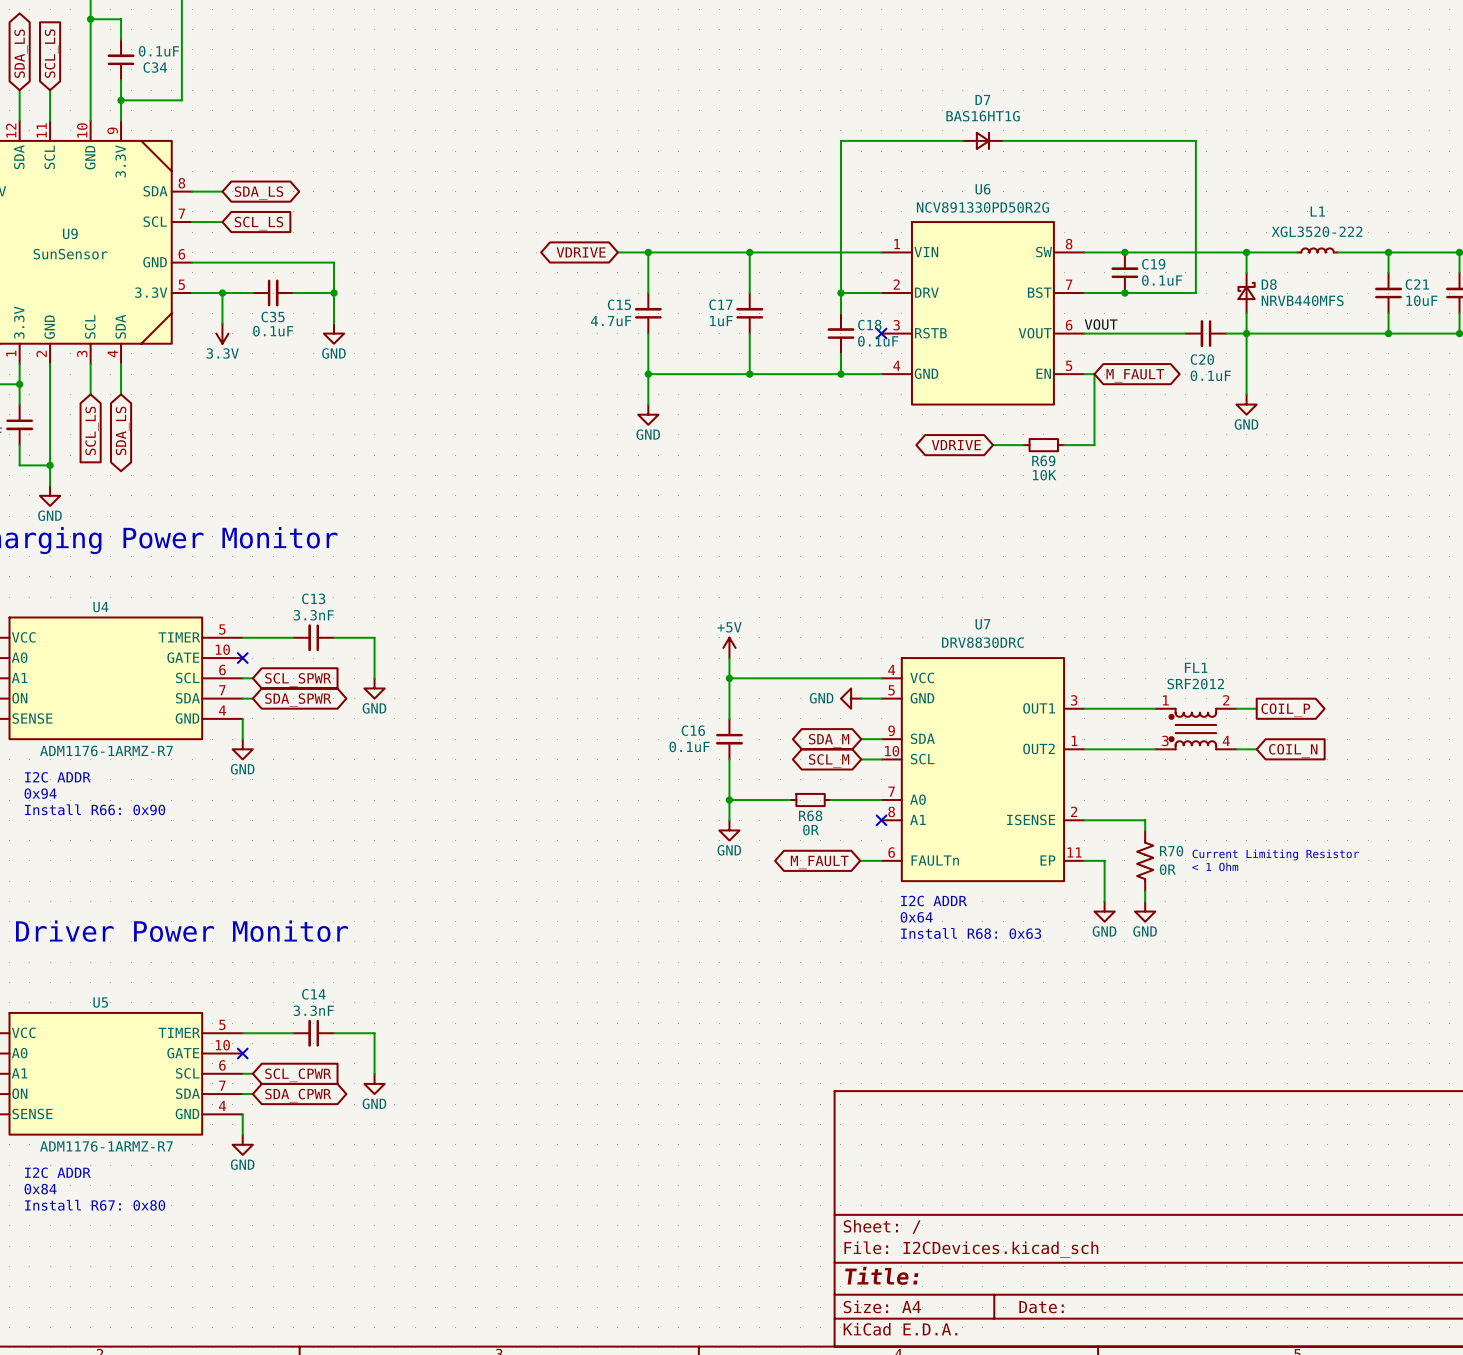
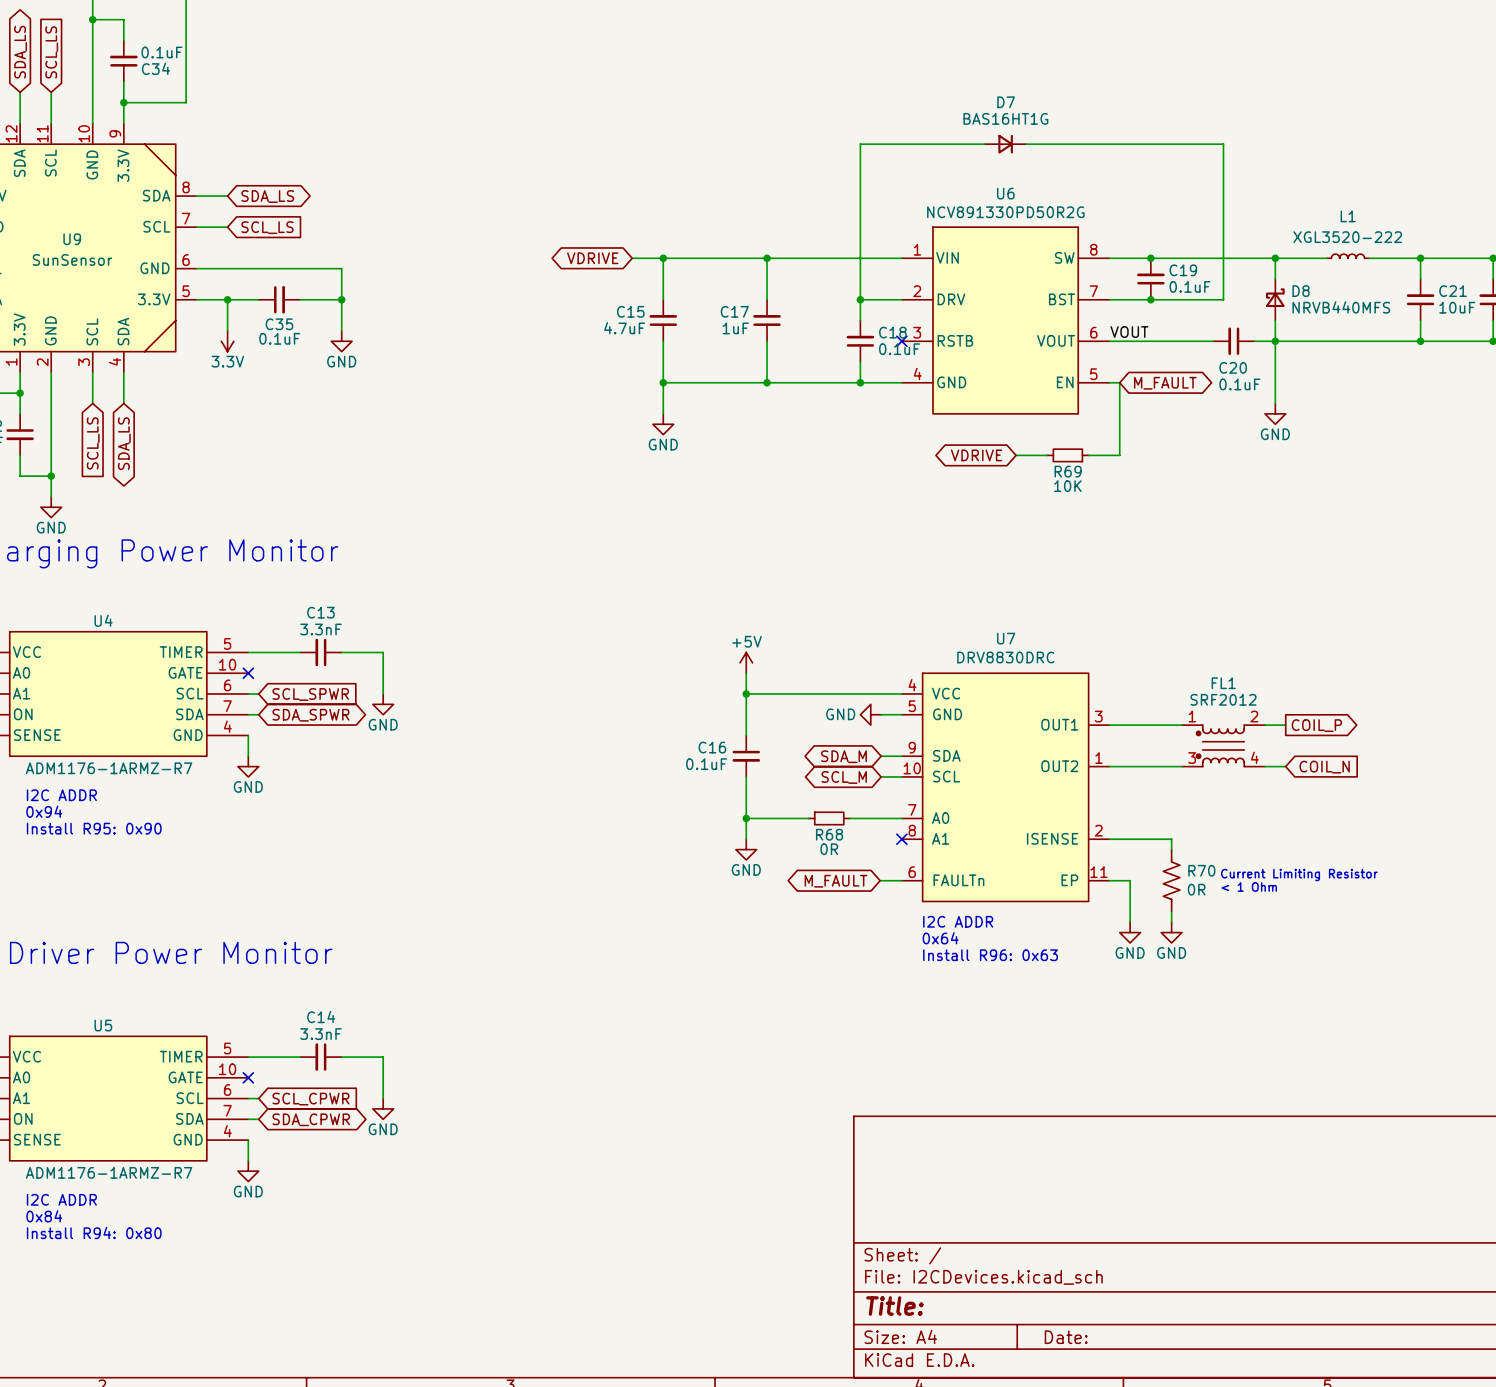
text: Install R66: 0x90 (95, 809) -> Install R95: 0x90 (94, 828)
text: Install R68: 0x63 (971, 933) -> Install R96: 0x63 (990, 955)
text: Install R67: 0x80 (95, 1205) -> Install R94: 0x80 (94, 1232)

